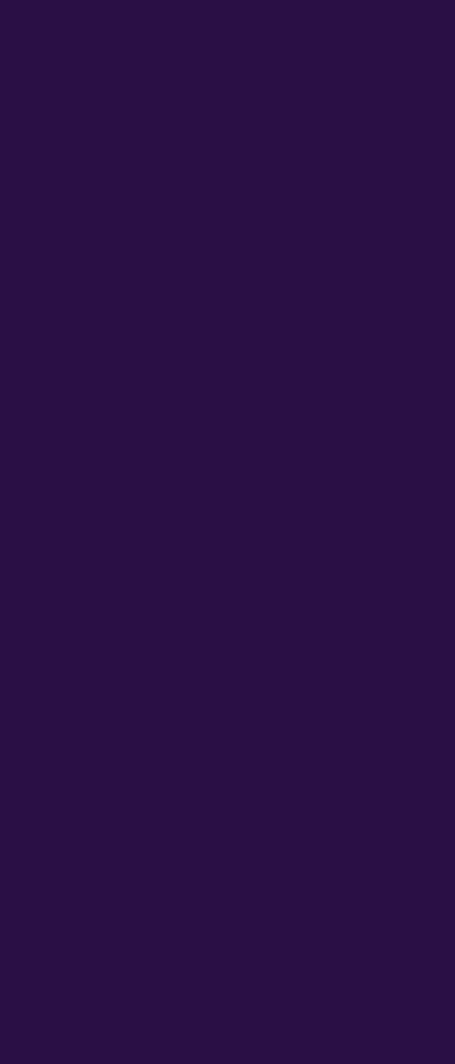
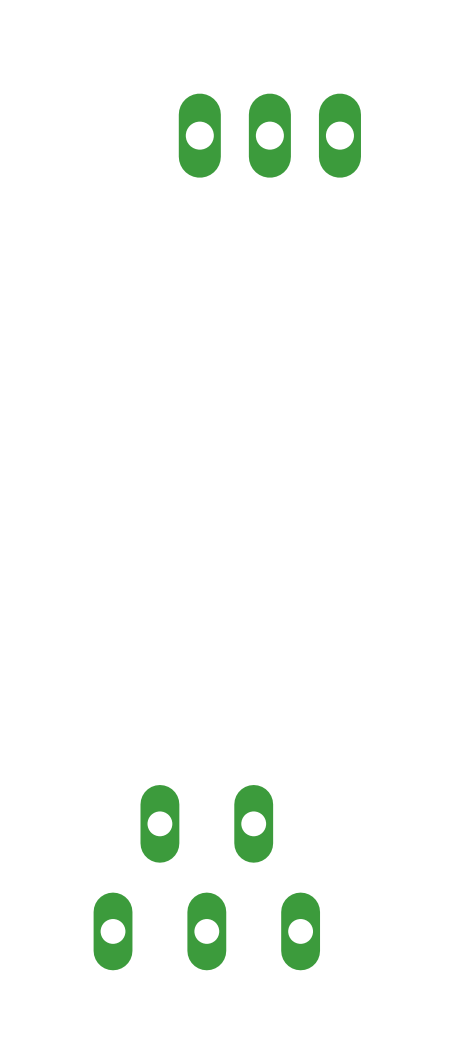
part: none -> (269, 135)
part: none -> (206, 877)

